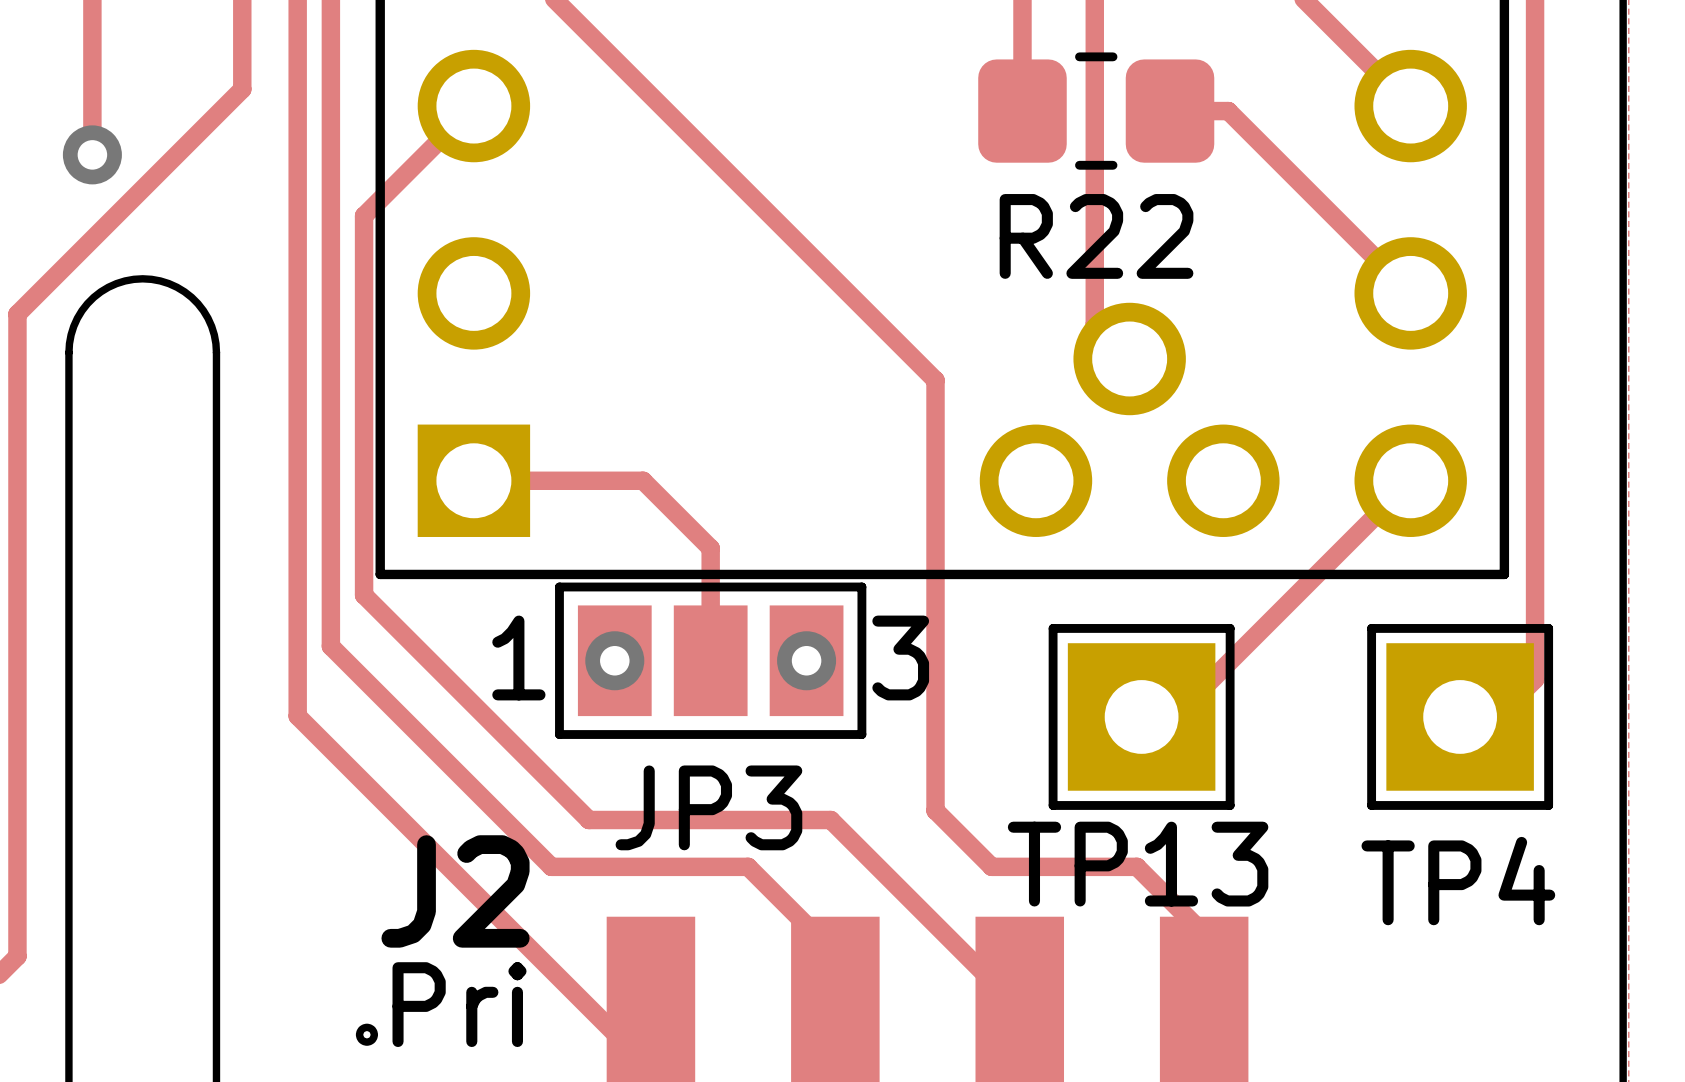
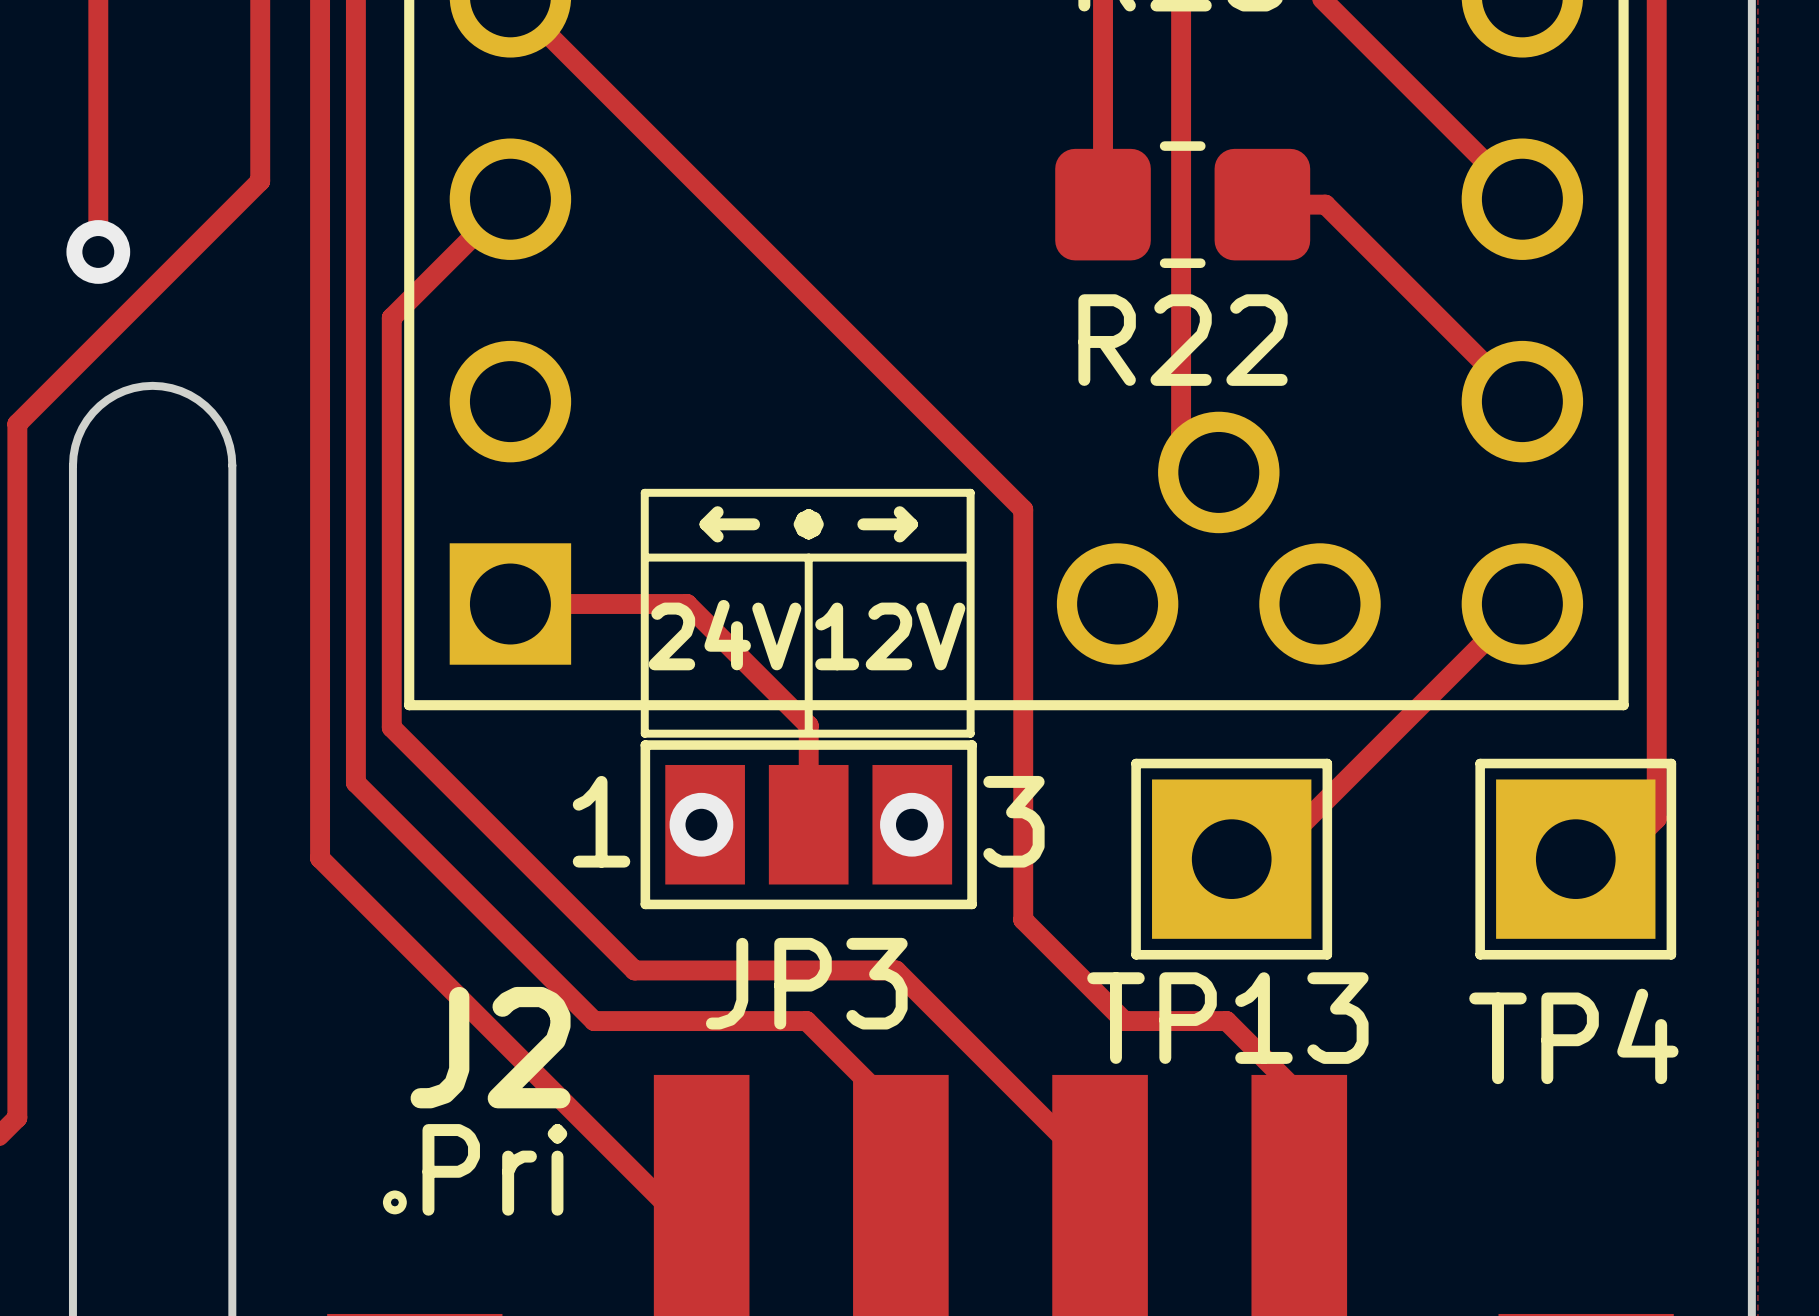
line: none -> (644, 492) (970, 492) (970, 733) (644, 733) (644, 492)
track: (935, 380) (935, 810) (991, 866) (1042, 866) -> (1009, 495) (1023, 509) (1023, 919) (1124, 1021)
text: none -> ←•→ (808, 524)
line: none -> (648, 557) (968, 557)
line: none -> (808, 557) (808, 731)
track: (637, 480) (643, 480) (710, 548) (710, 660) -> (687, 604) (808, 725) (808, 824)
text: none -> 24V (725, 635)
text: none -> 12V (890, 636)
via position: (614, 660) -> (701, 824)
JP3 position: (710, 660) -> (808, 824)
via position: (806, 660) -> (911, 824)

